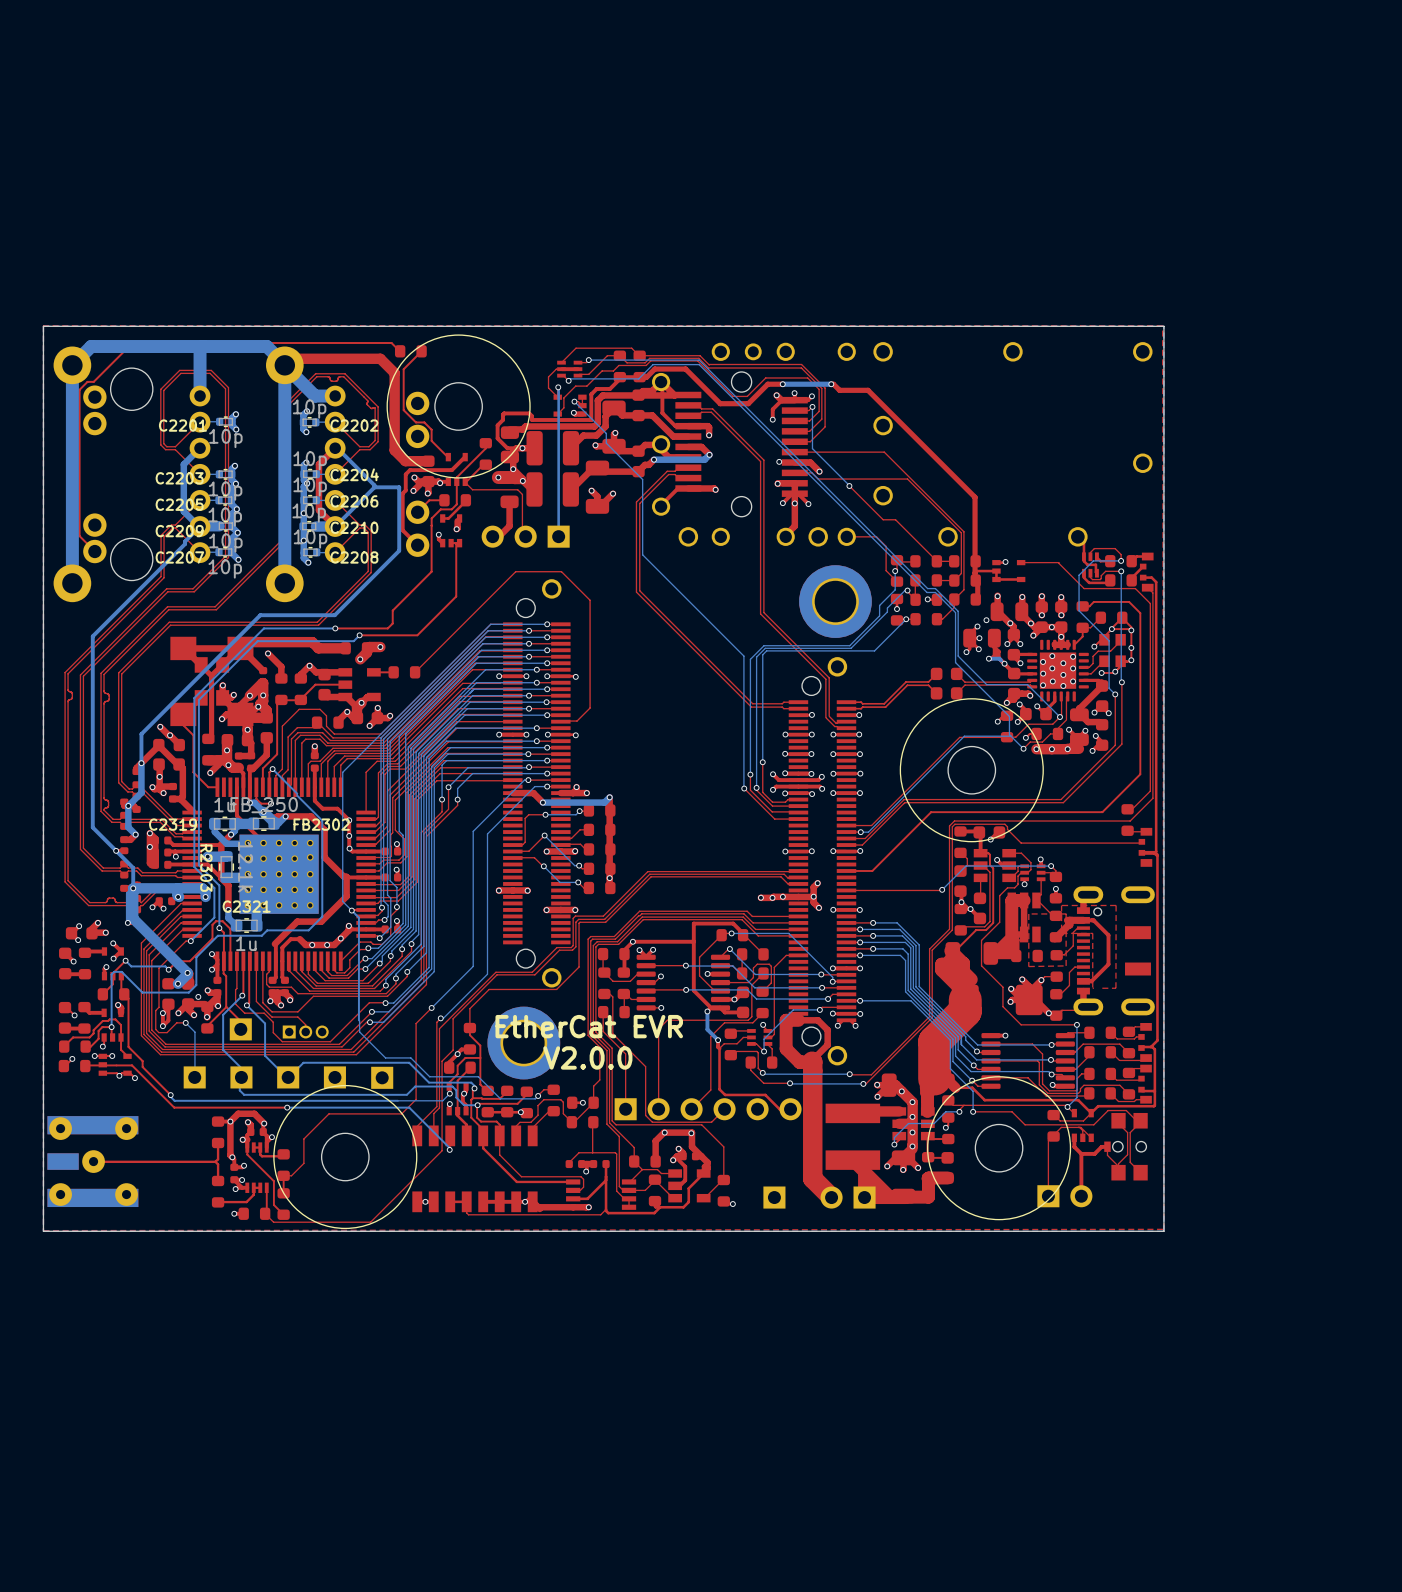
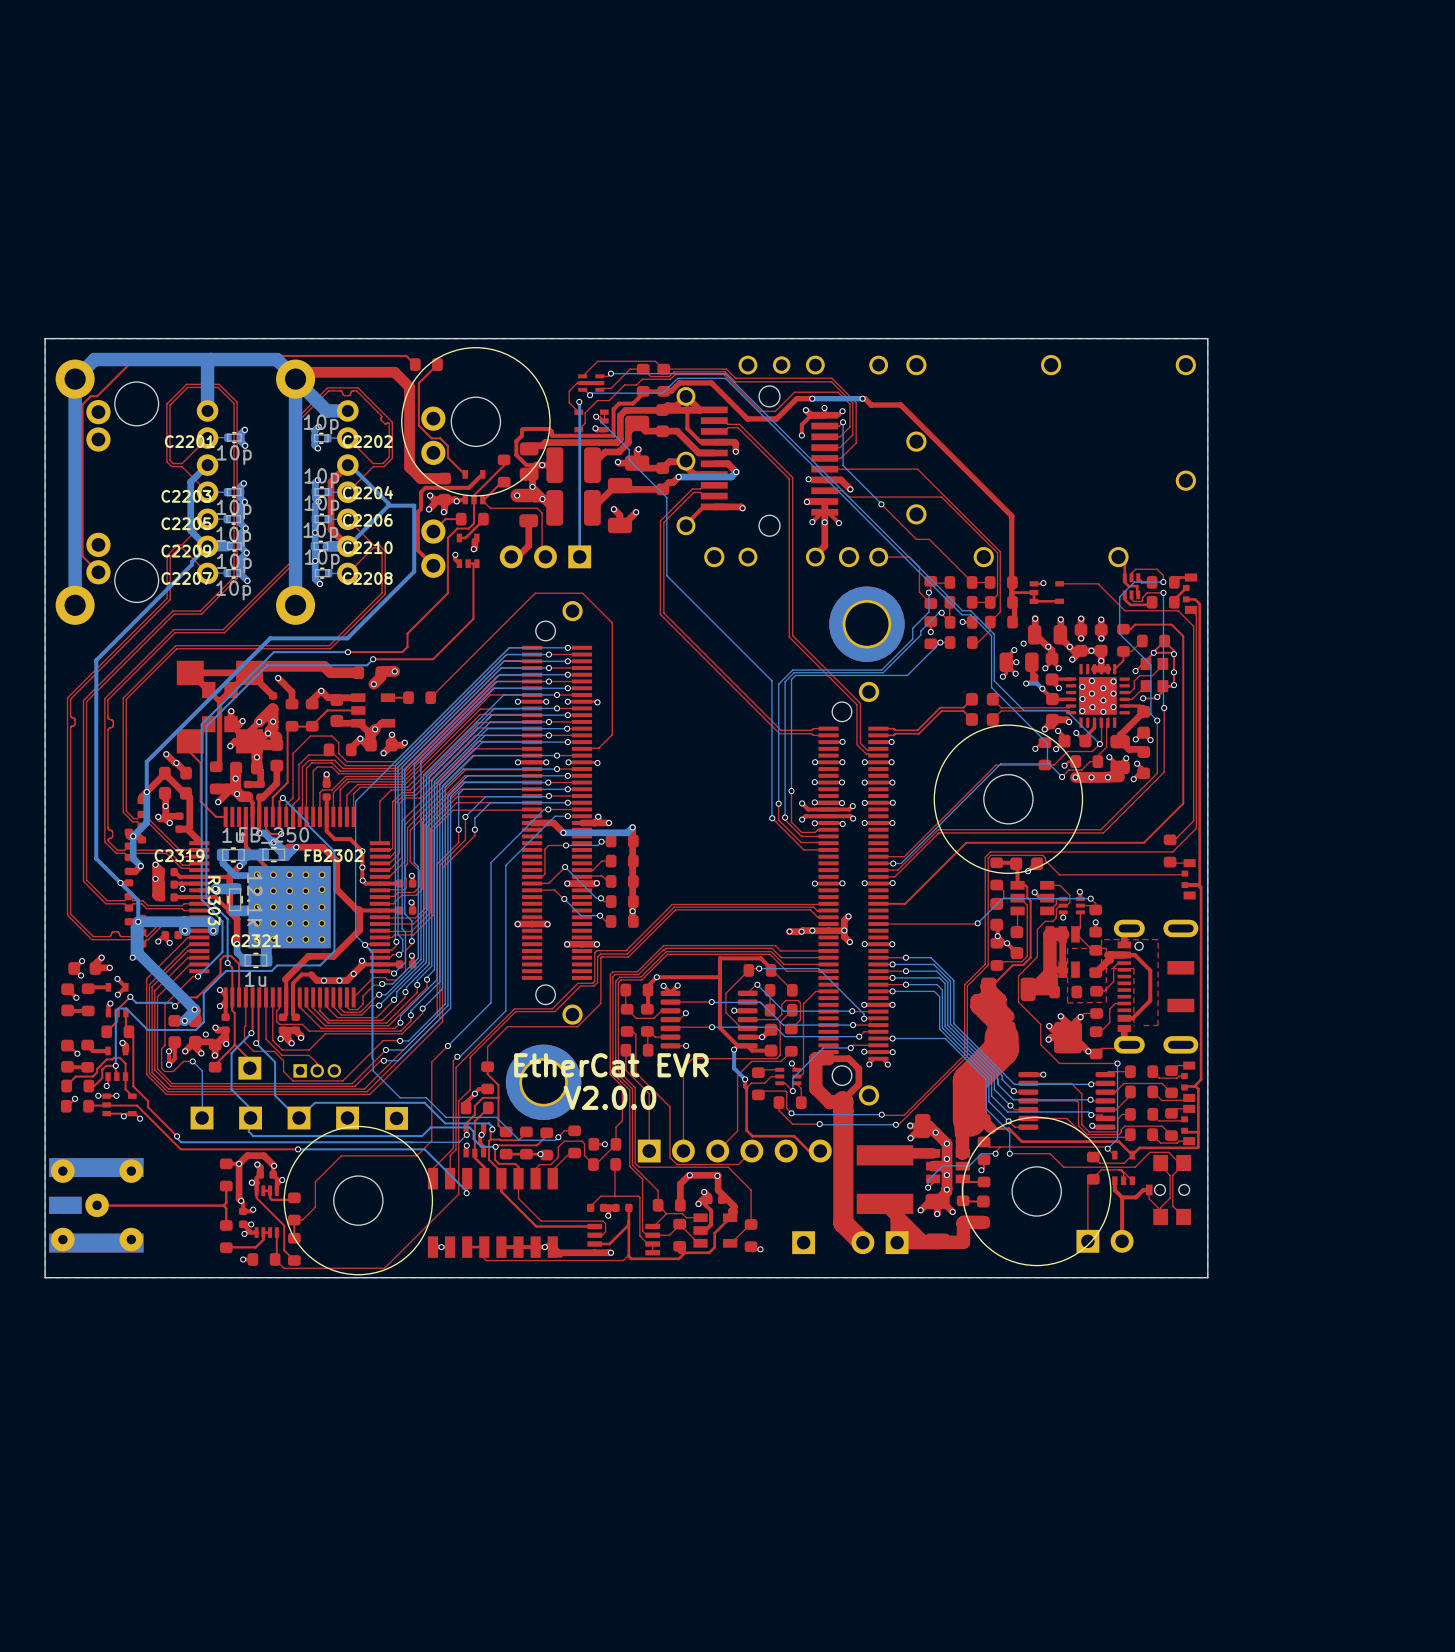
top zone outline: (1162, 325) (1163, 1229) (43, 1230) (43, 325) (1162, 325) -> none

